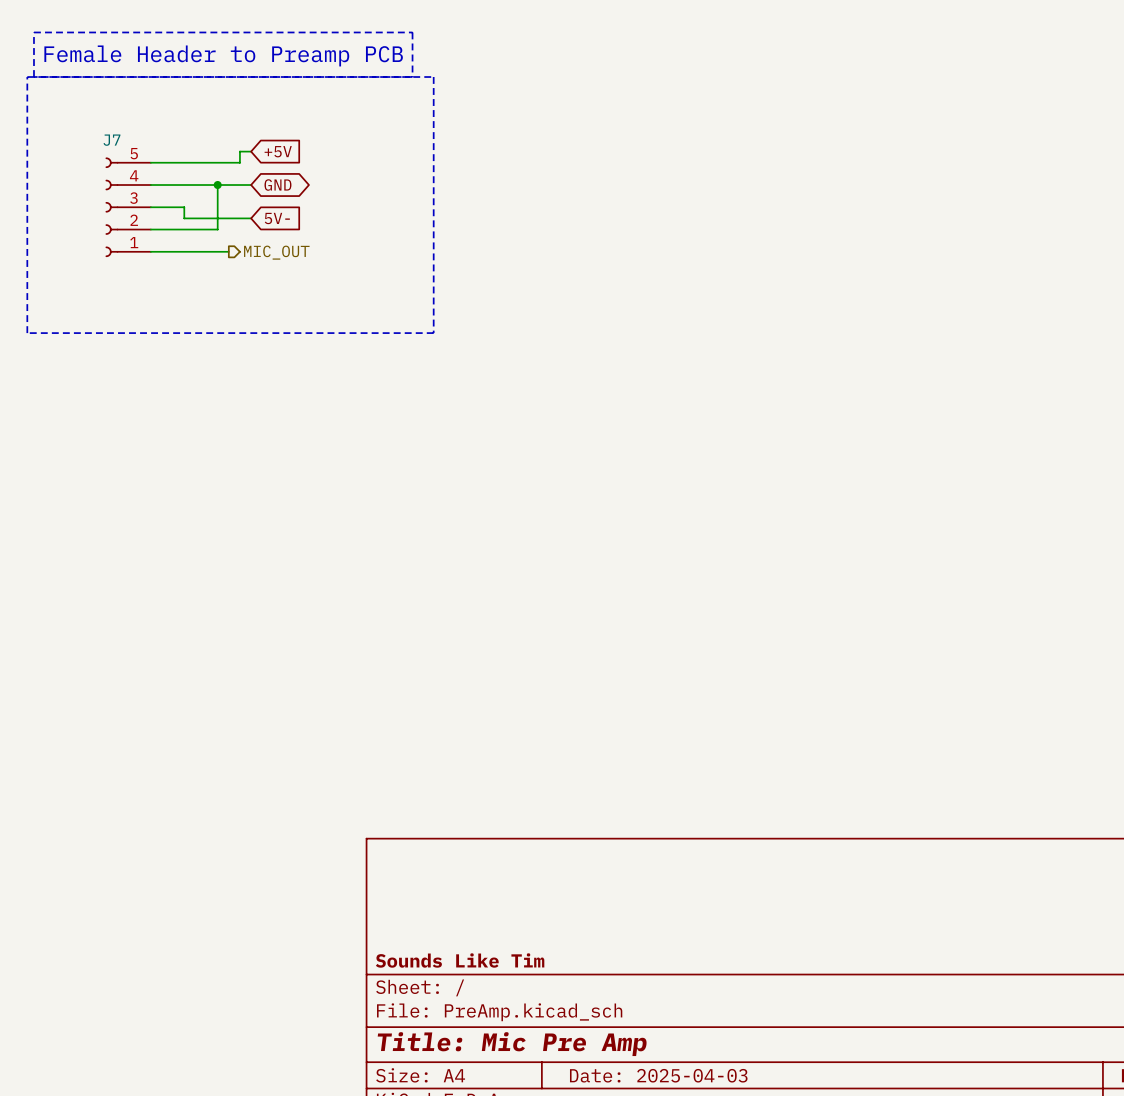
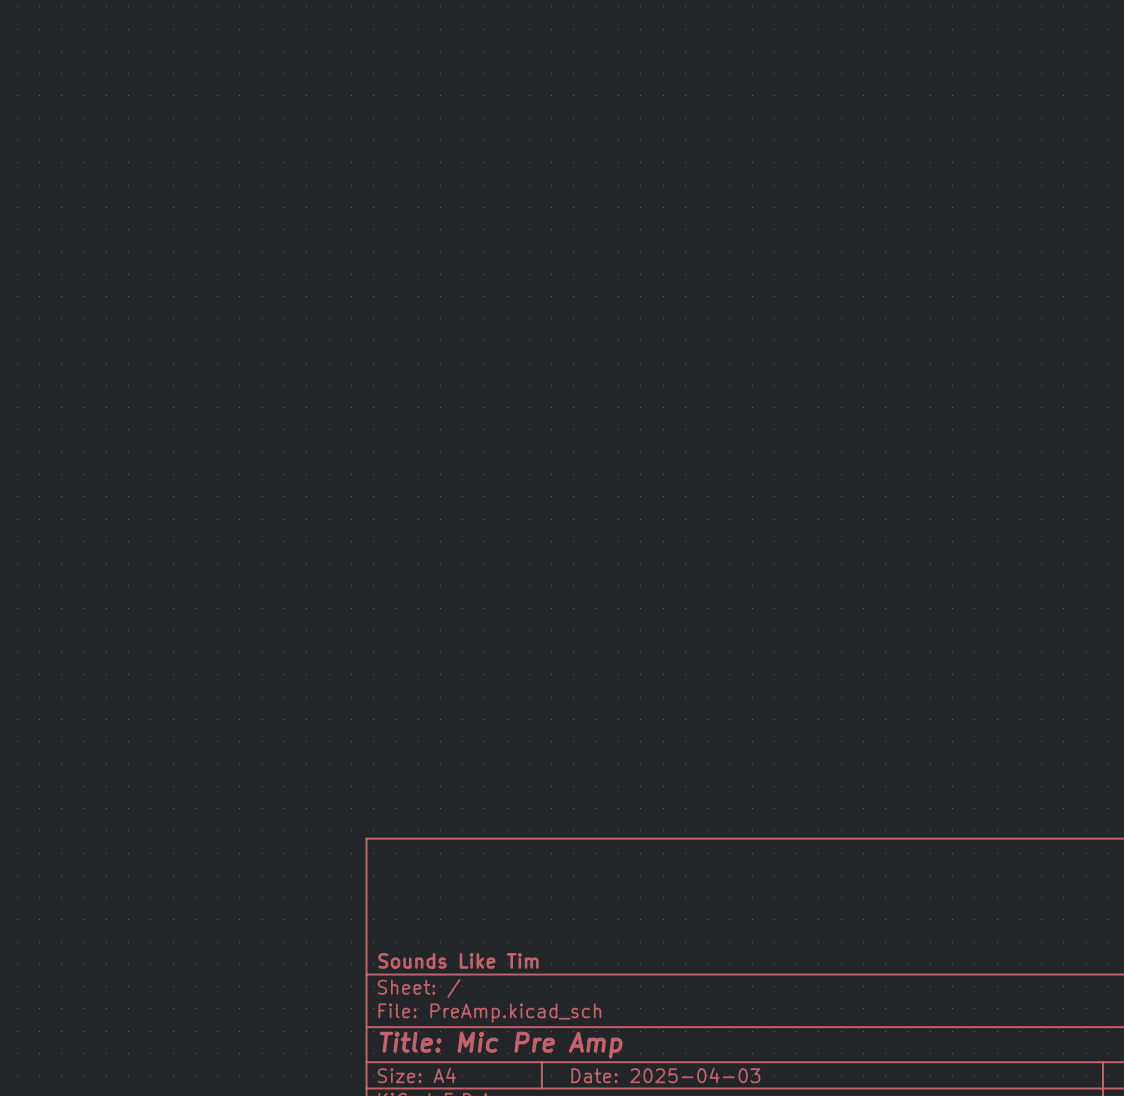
text: Female Header to Preamp PCB (223, 55) -> none
line: (27, 77) (433, 77) (433, 333) (27, 333) (27, 77) -> none
line: (33, 77) (33, 32) (412, 32) (412, 77) -> none
wire: (251, 151) (239, 151) (239, 162) (150, 162) -> none
global label: +5V (278, 151) -> none
wire: (150, 185) (251, 185) -> none
wire: (217, 185) (217, 229) (150, 229) -> none
junction: (217, 185) -> none
global label: GND (277, 185) -> none
J7: (128, 207) -> none
wire: (150, 207) (184, 207) (184, 218) (251, 218) -> none
global label: 5V- (277, 218) -> none
wire: (150, 251) (228, 251) -> none
hierarchical label: MIC_OUT (276, 252) -> none

